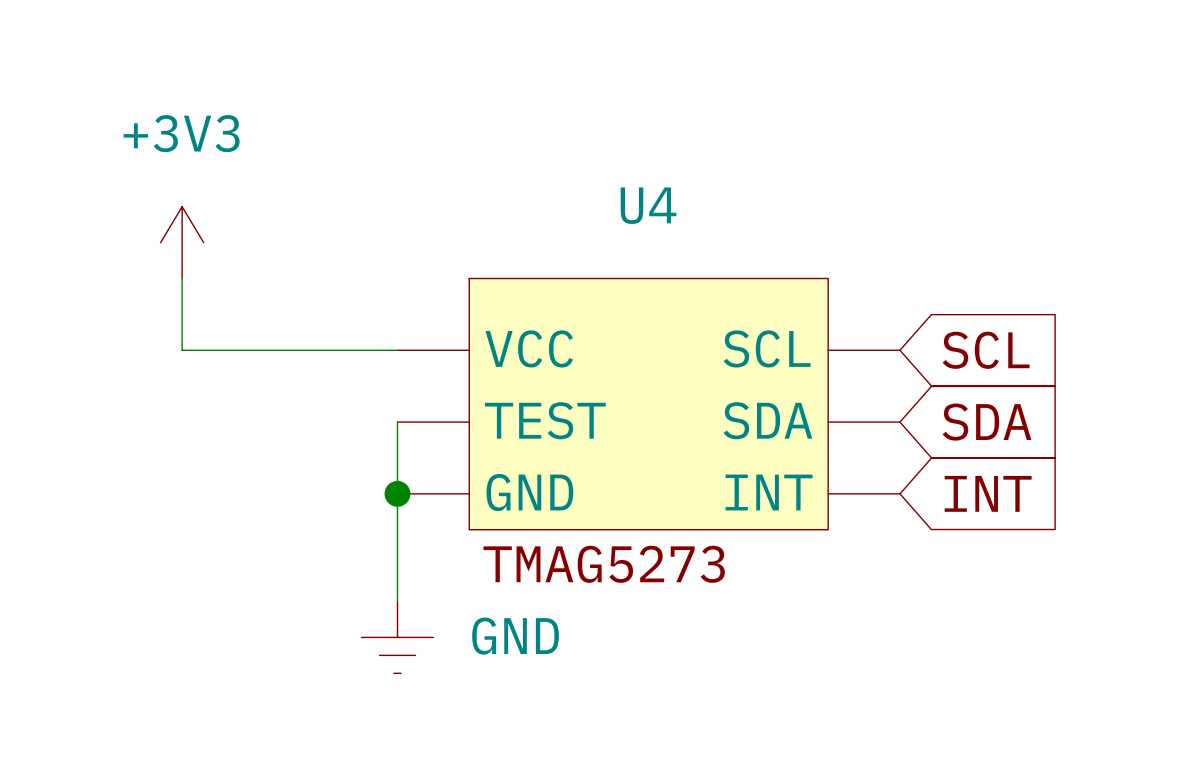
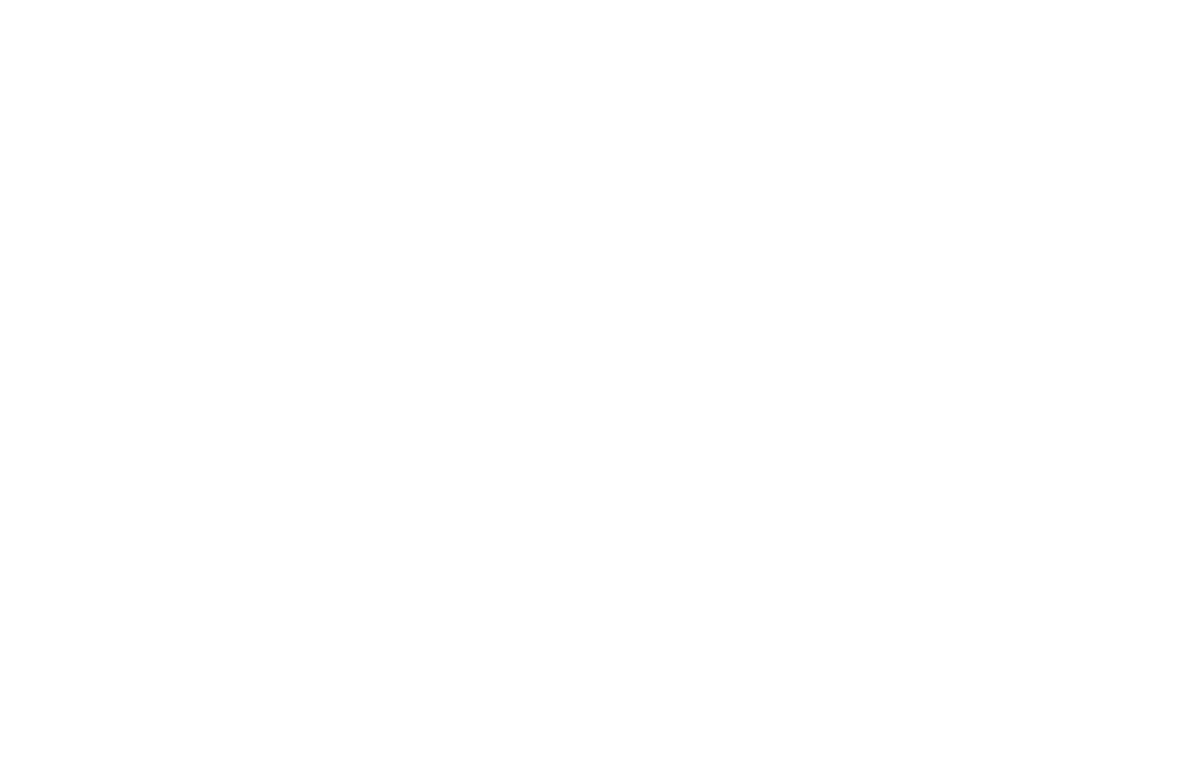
power symbol: +3V3 (182, 242) -> none
wire: (182, 278) (182, 350) (397, 350) -> none
global label: SCL (986, 350) -> none
U4: (648, 404) -> none
wire: (397, 422) (397, 601) -> none
global label: SDA (987, 422) -> none
junction: (397, 493) -> none
global label: INT (988, 493) -> none
power symbol: GND (397, 637) -> none

